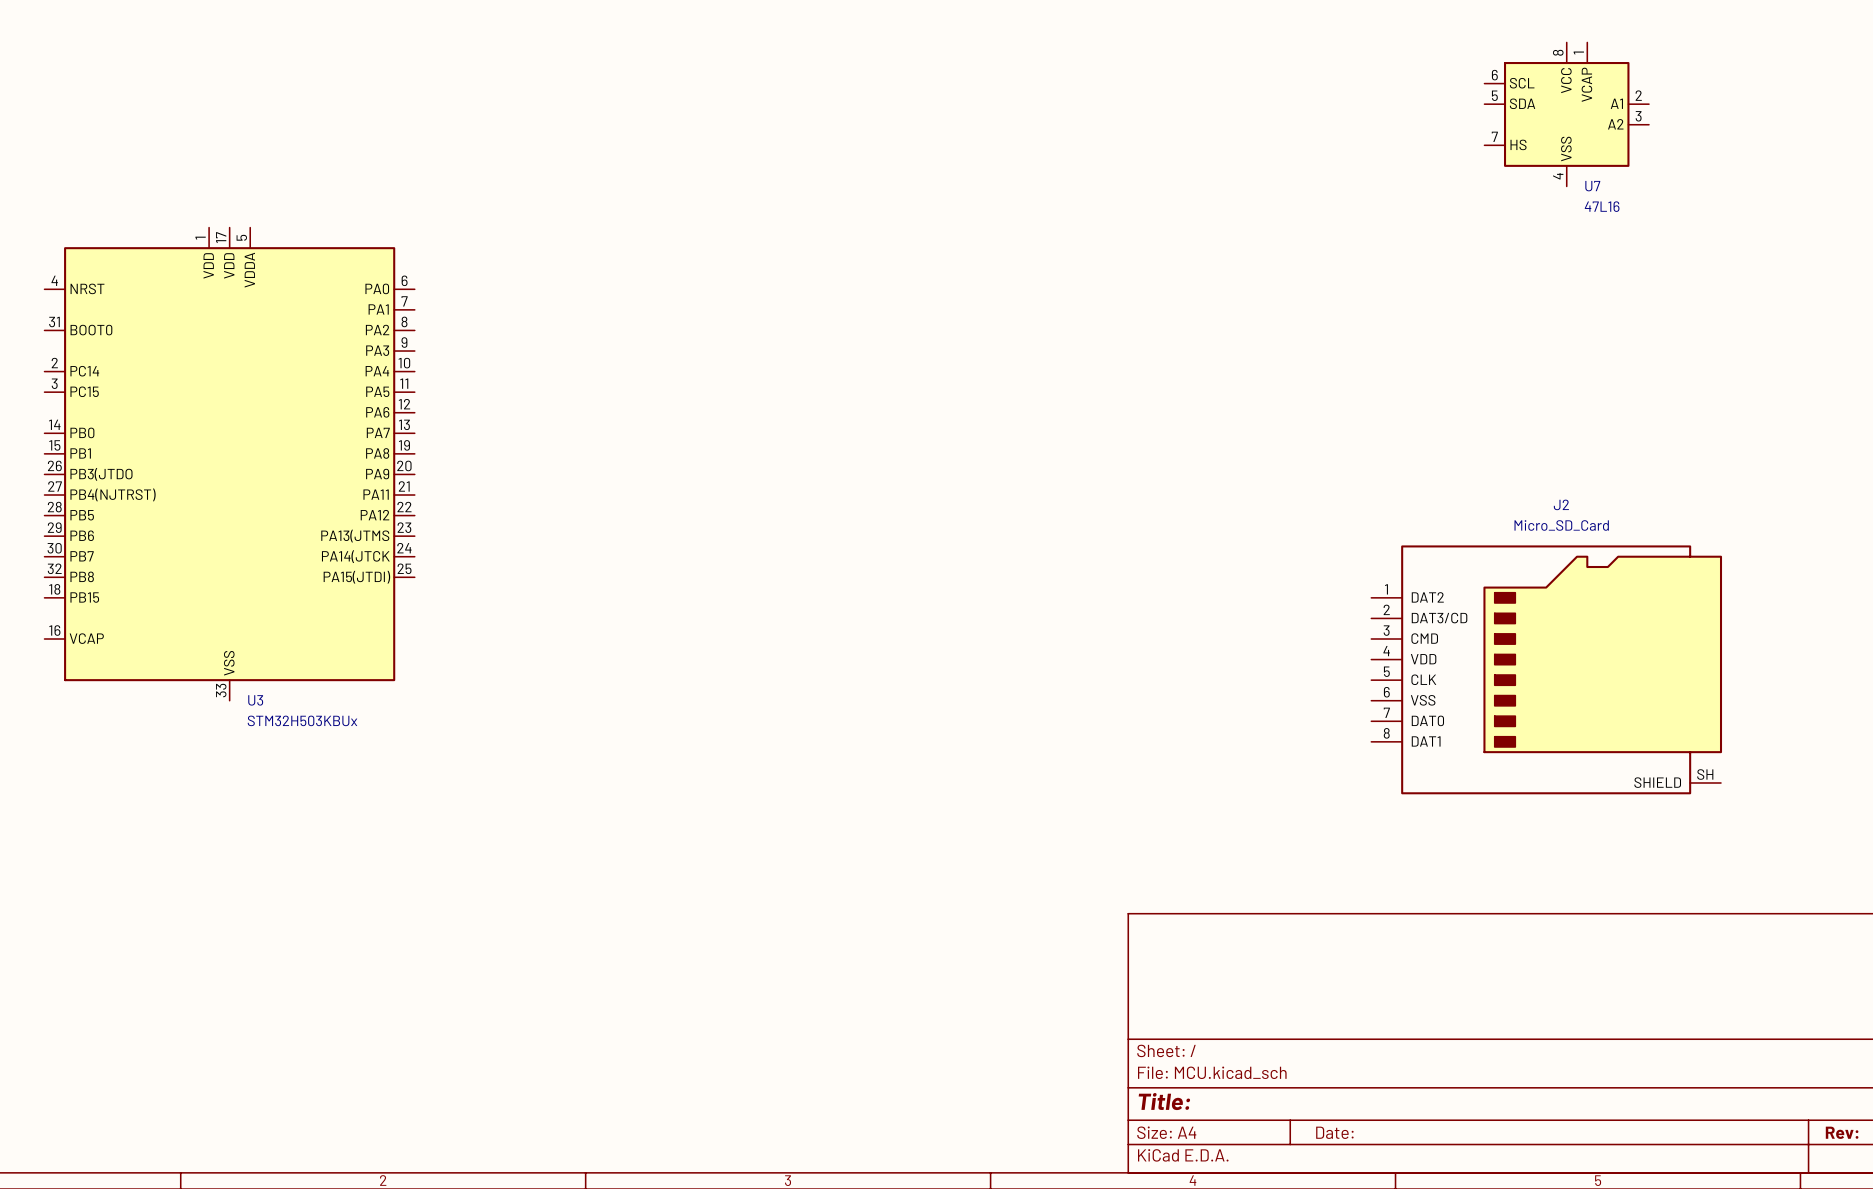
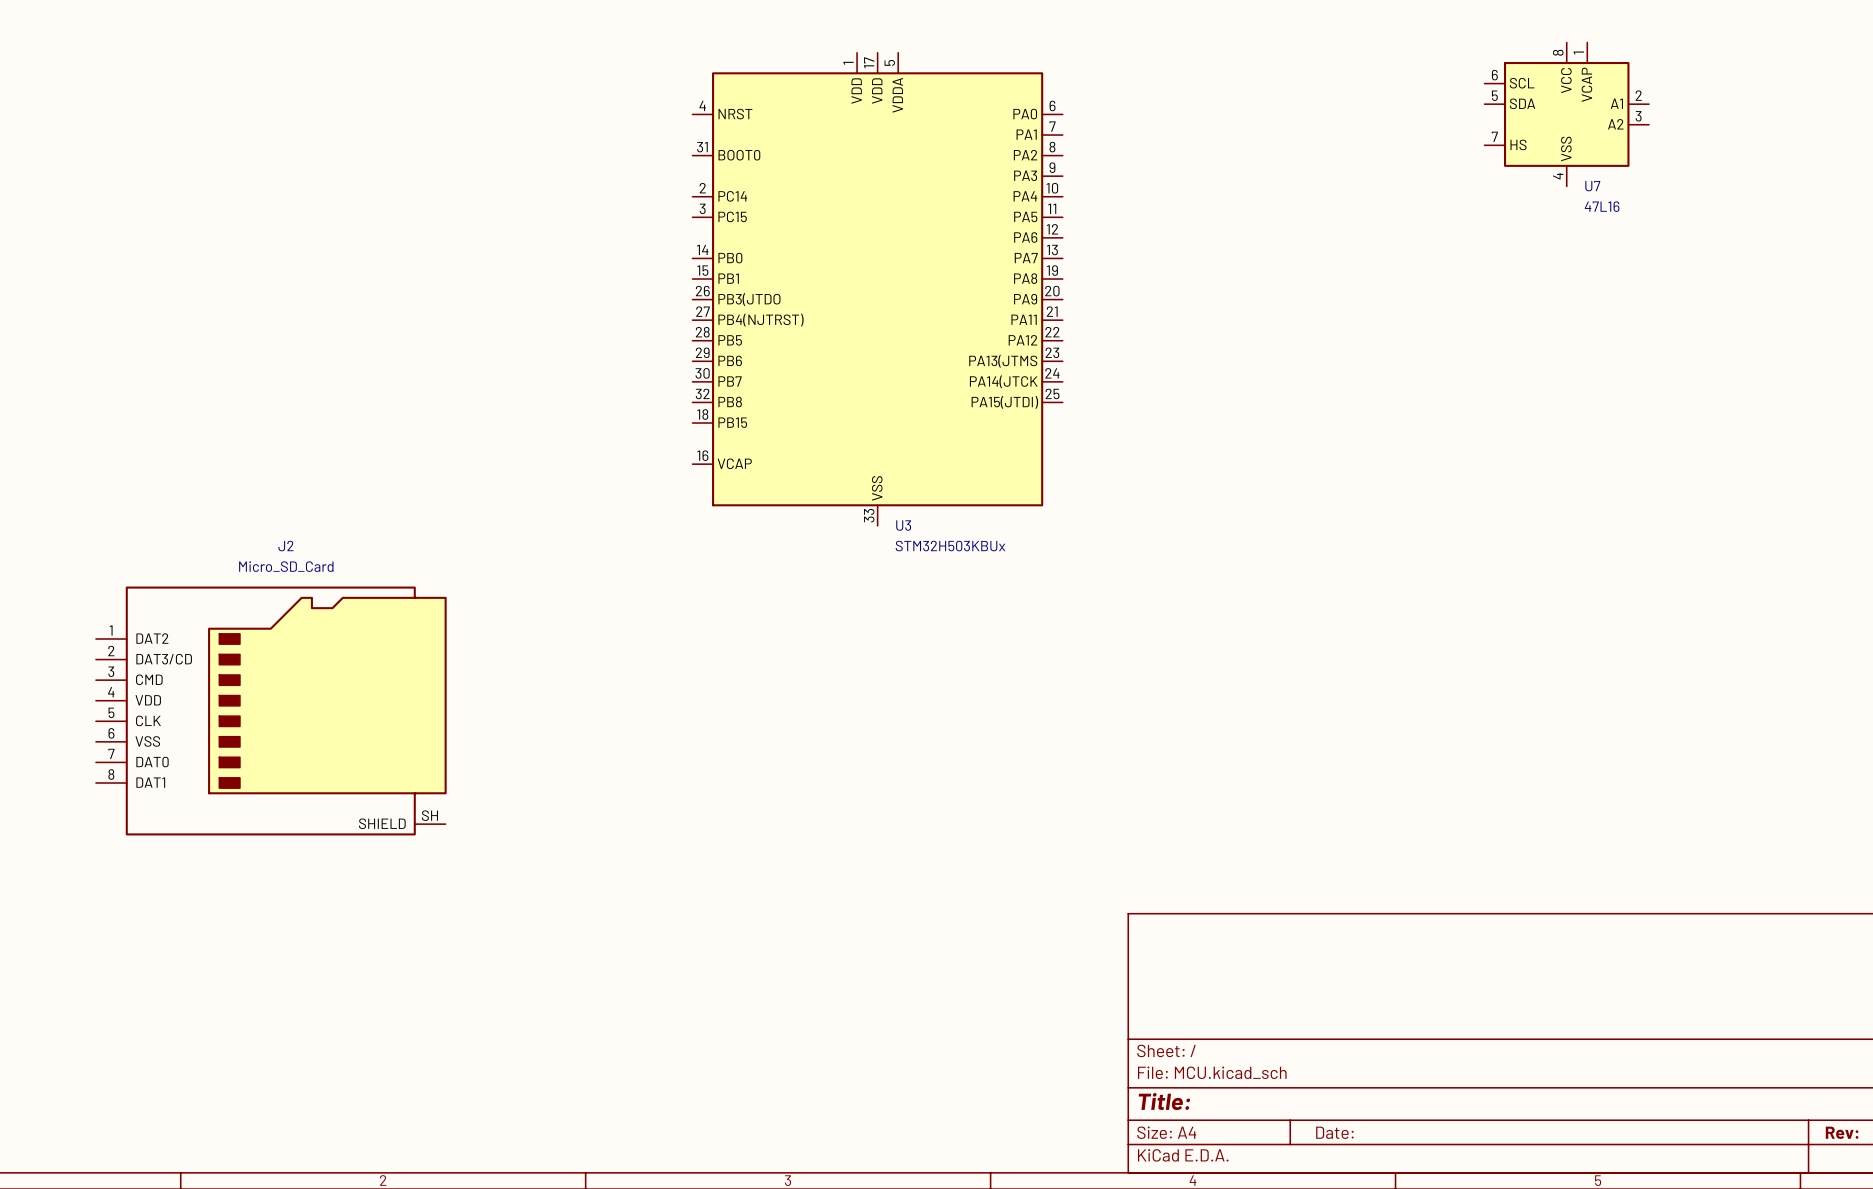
U3 position: (229, 464) -> (877, 289)
J2 position: (1546, 669) -> (271, 710)

